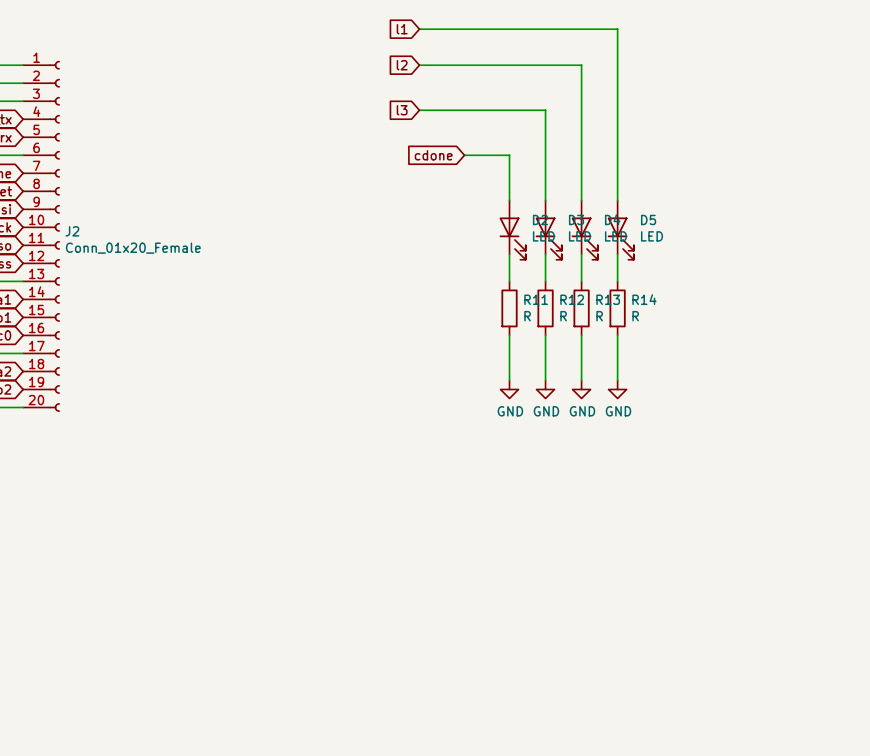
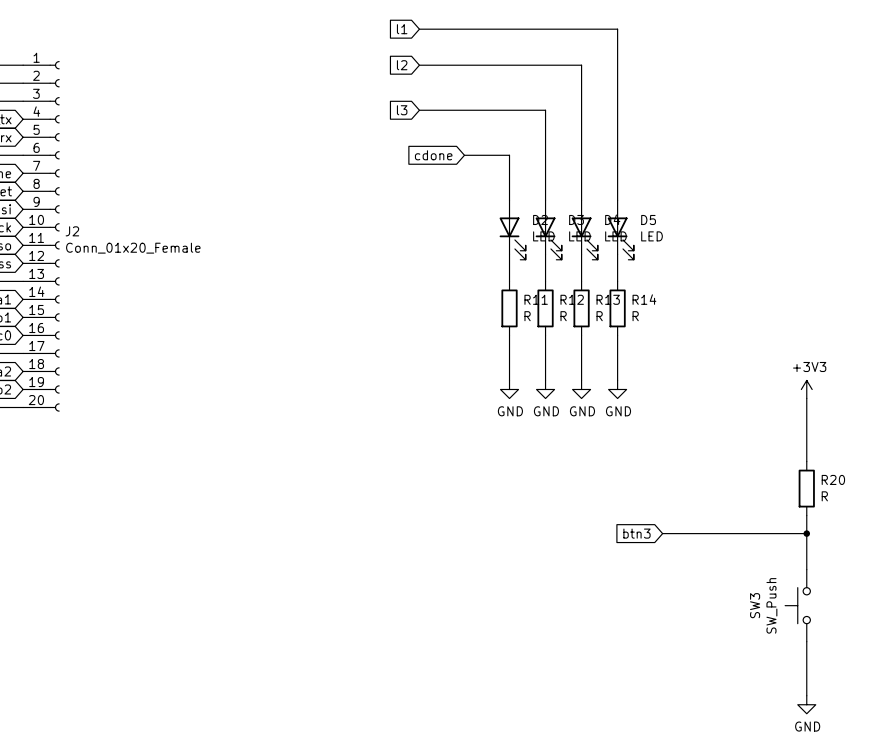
power symbol: none -> +3V3 (806, 389)
wire: none -> (806, 398) (806, 461)
R20: none -> R (806, 488)
wire: none -> (806, 515) (806, 569)
global label: none -> btn3 (637, 533)
wire: none -> (662, 533) (806, 533)
junction: none -> (806, 533)
SW3: none -> SW_Push (797, 605)
wire: none -> (806, 641) (806, 695)
power symbol: none -> GND (806, 704)

